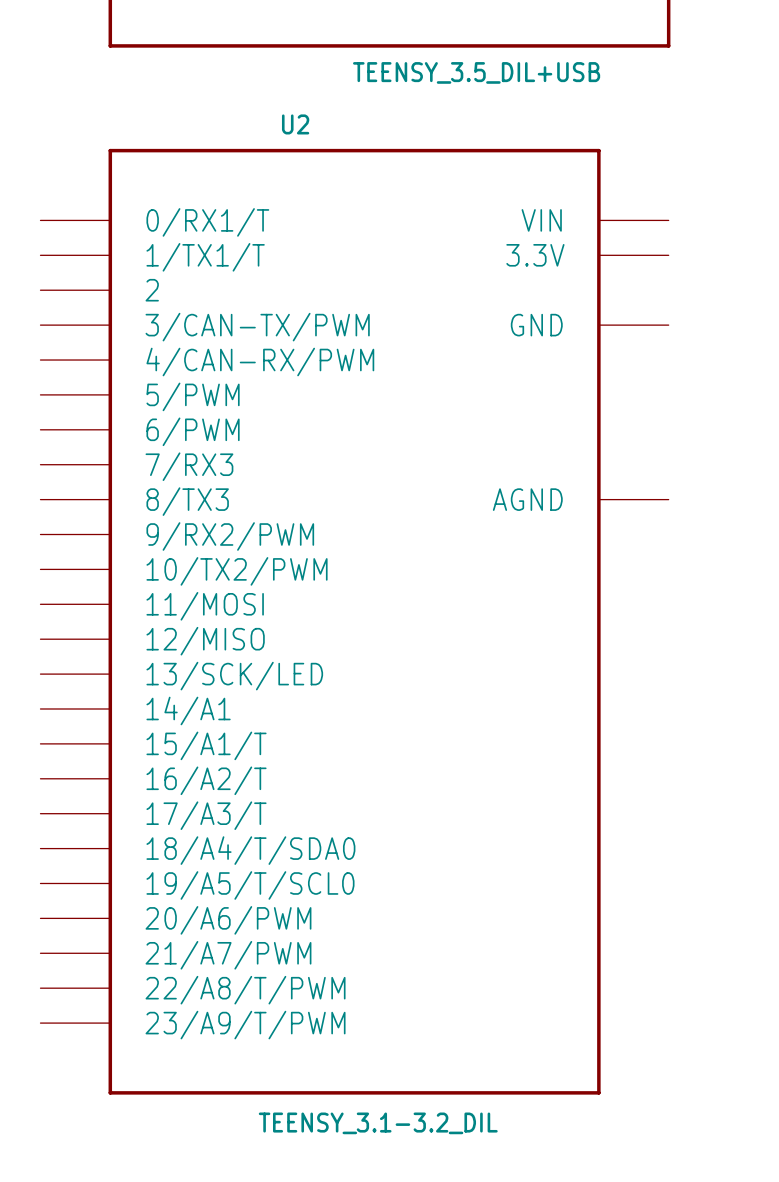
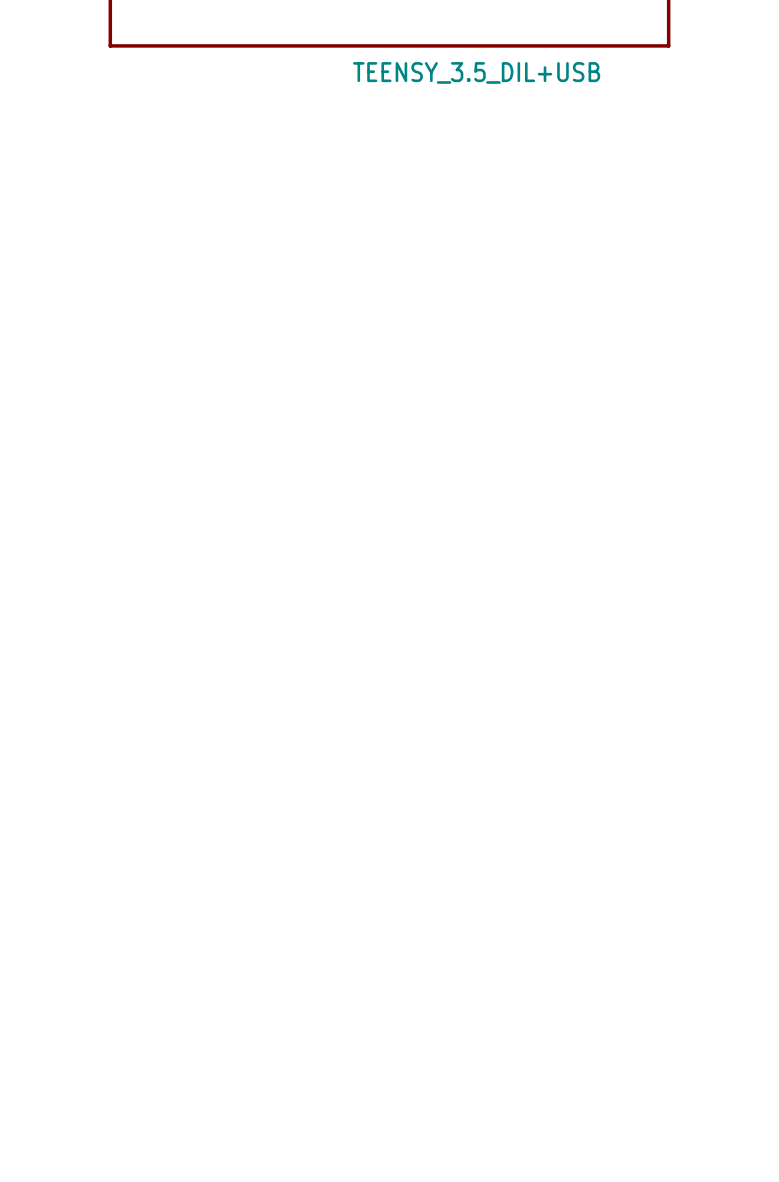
U2: TEENSY_3.1-3.2_DIL (354, 621) -> none

